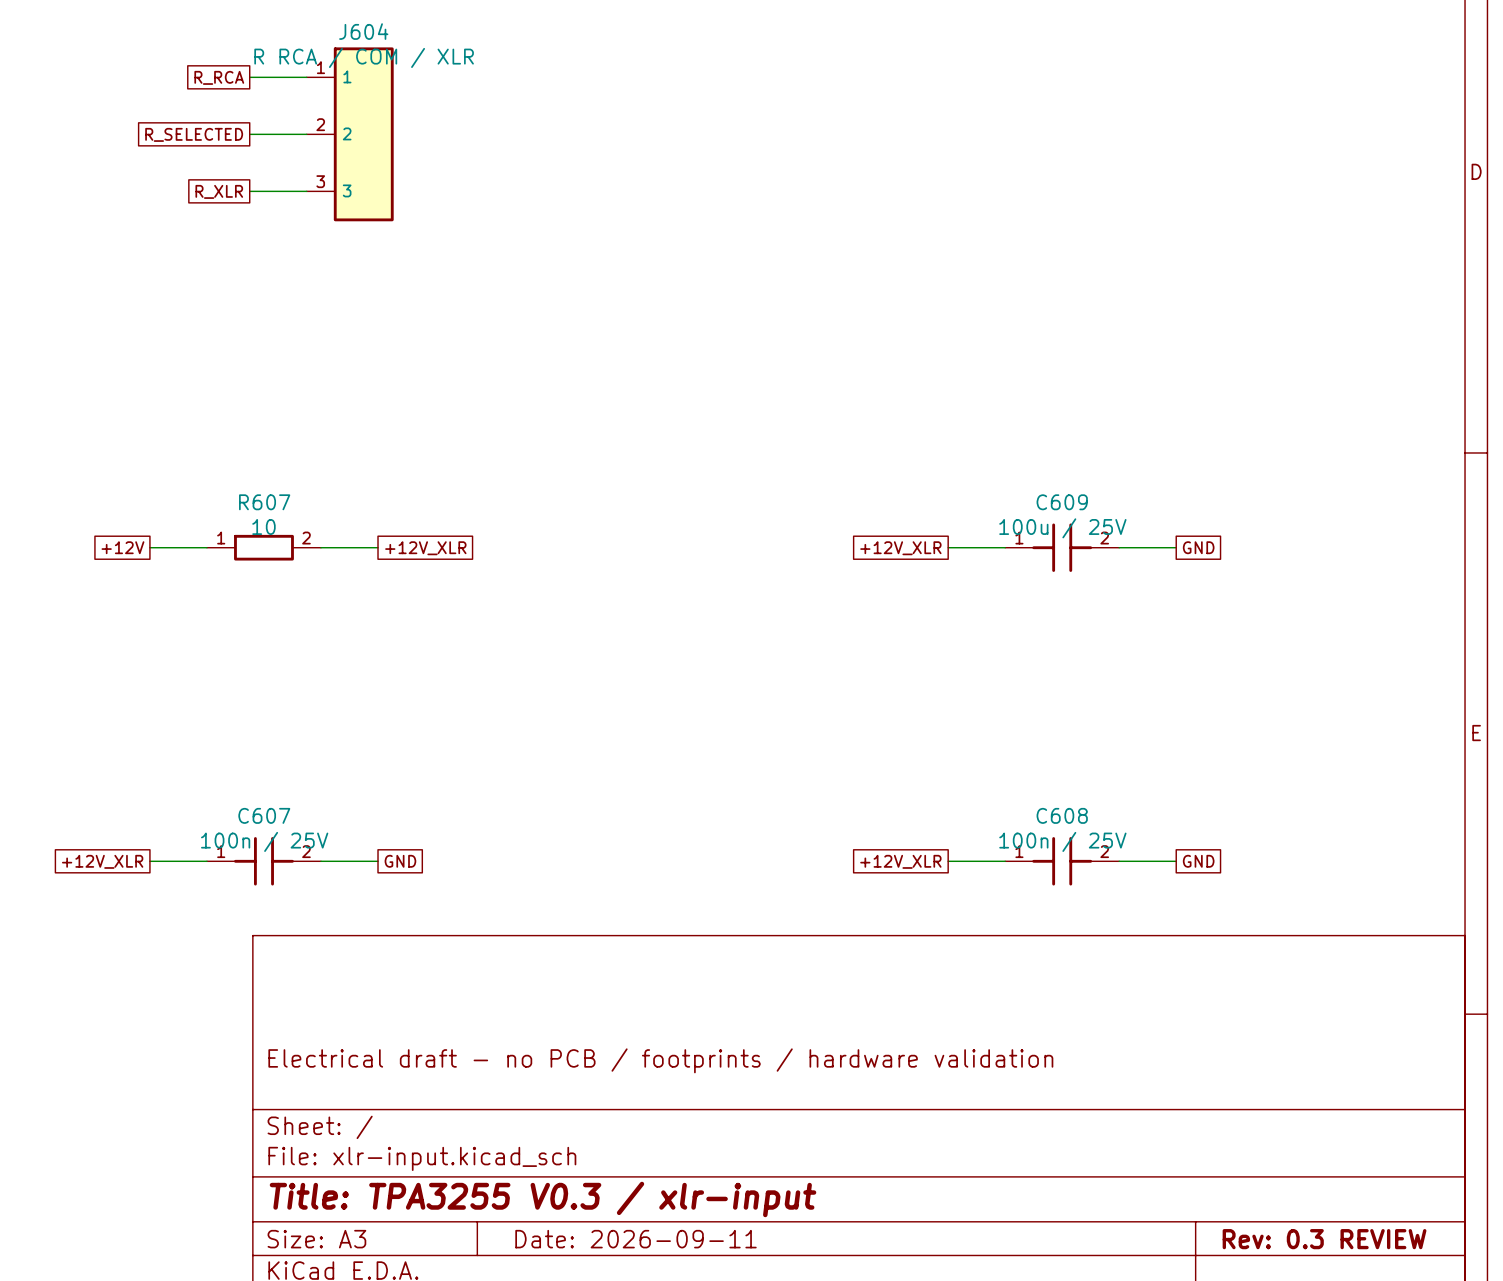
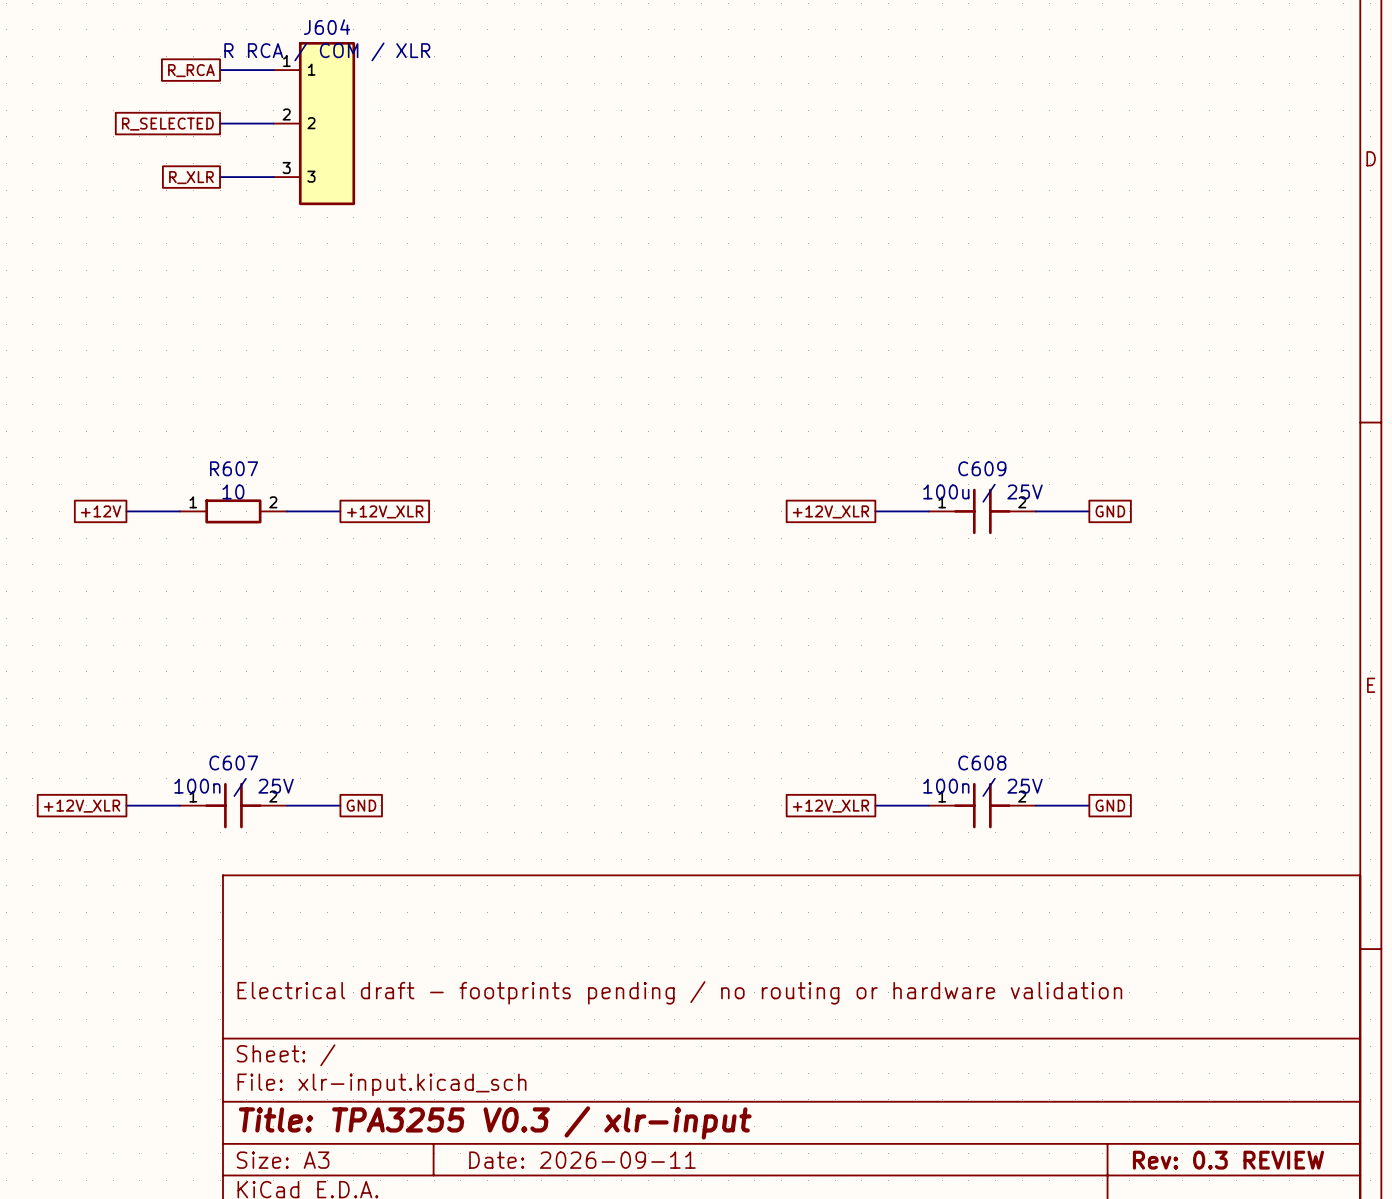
title block: Electrical draft - no PCB / footprints / hardware validation (660, 1060) -> Electrical draft - footprints pending / no routing or hardware validation (679, 992)

